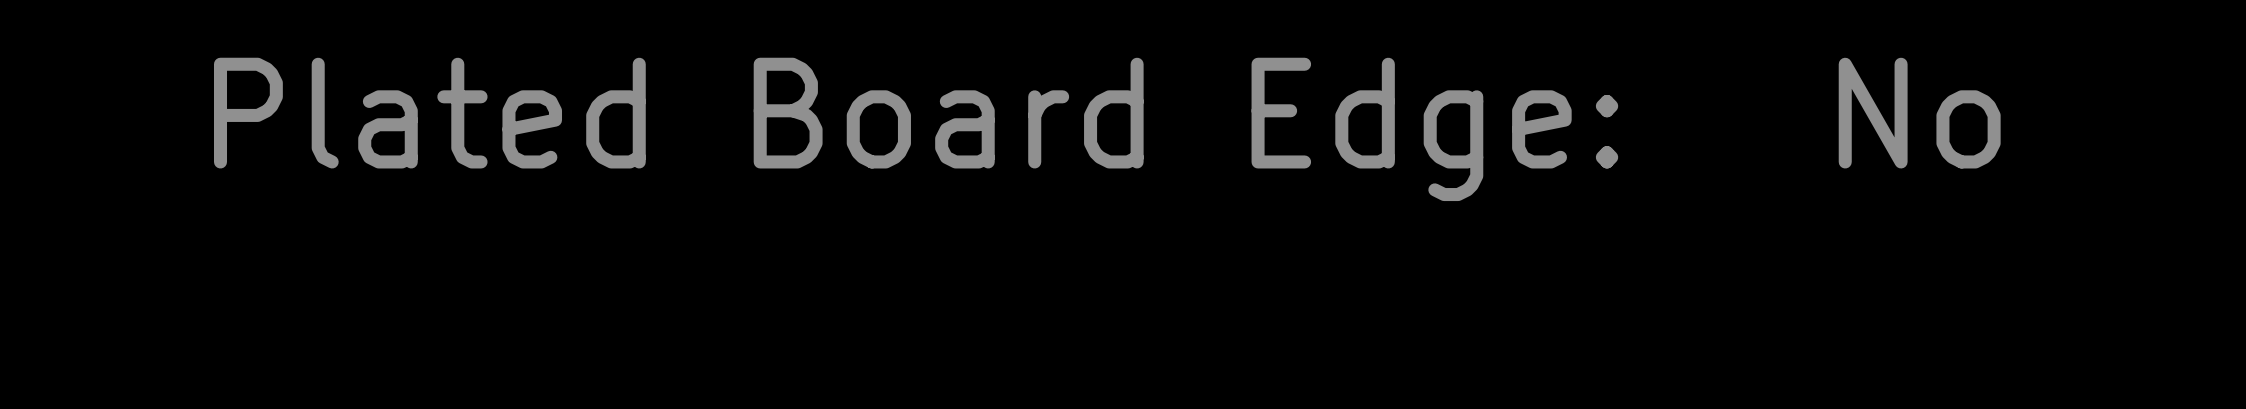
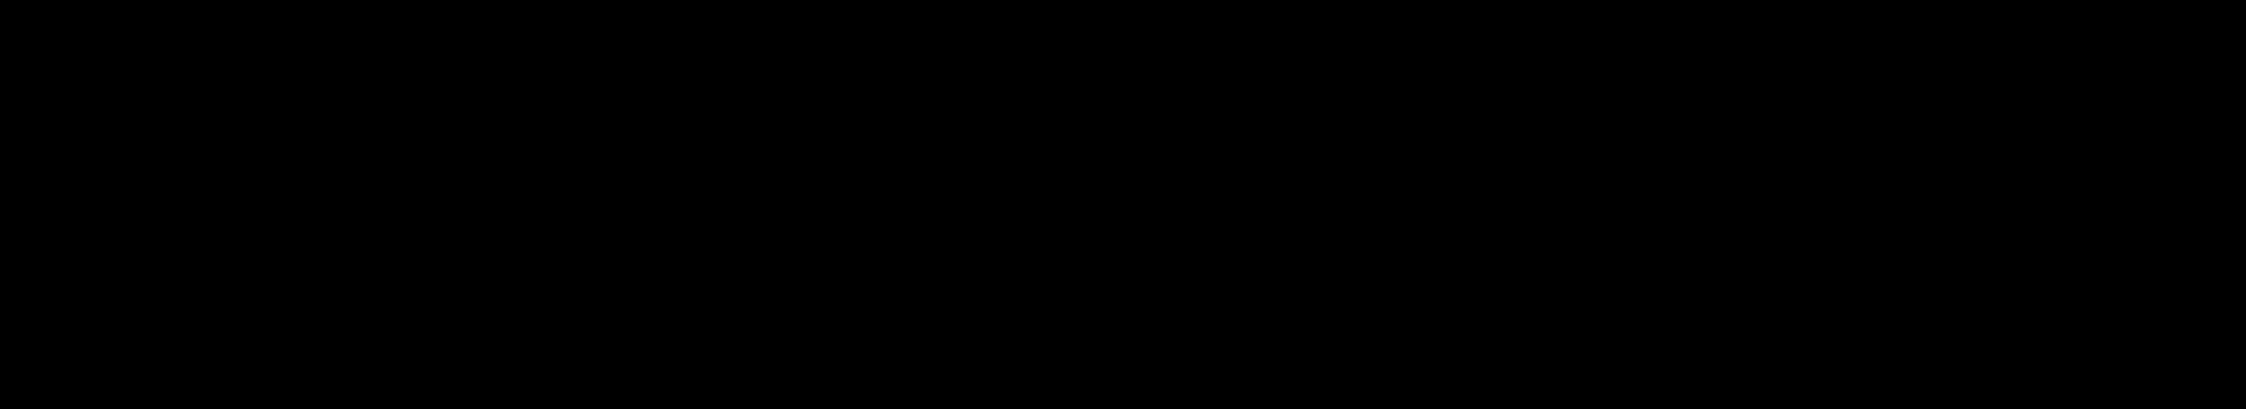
text: No (1919, 113) -> none
text: Plated Board Edge: (916, 129) -> none

